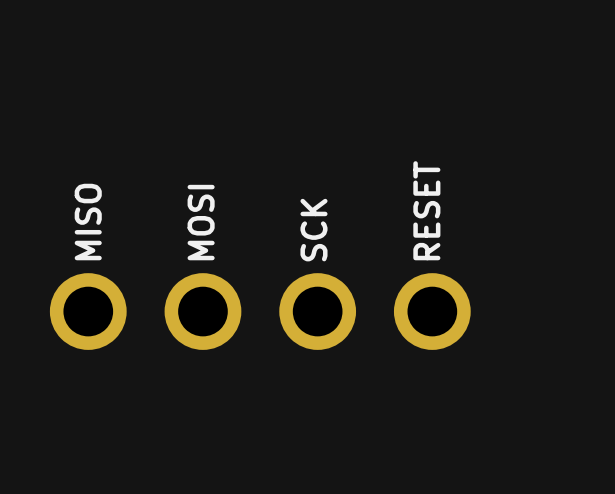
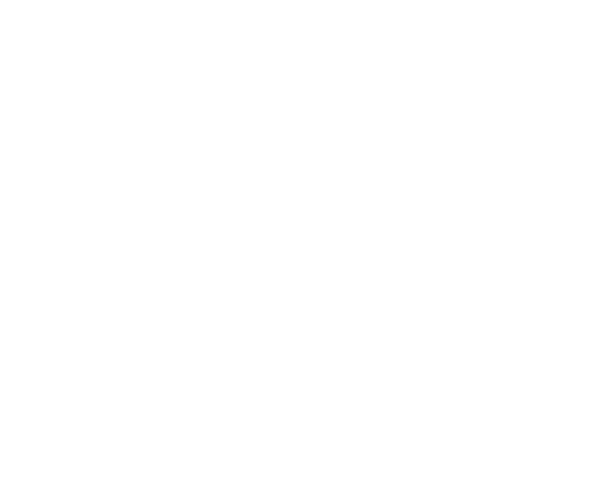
part: (260, 311) -> none

